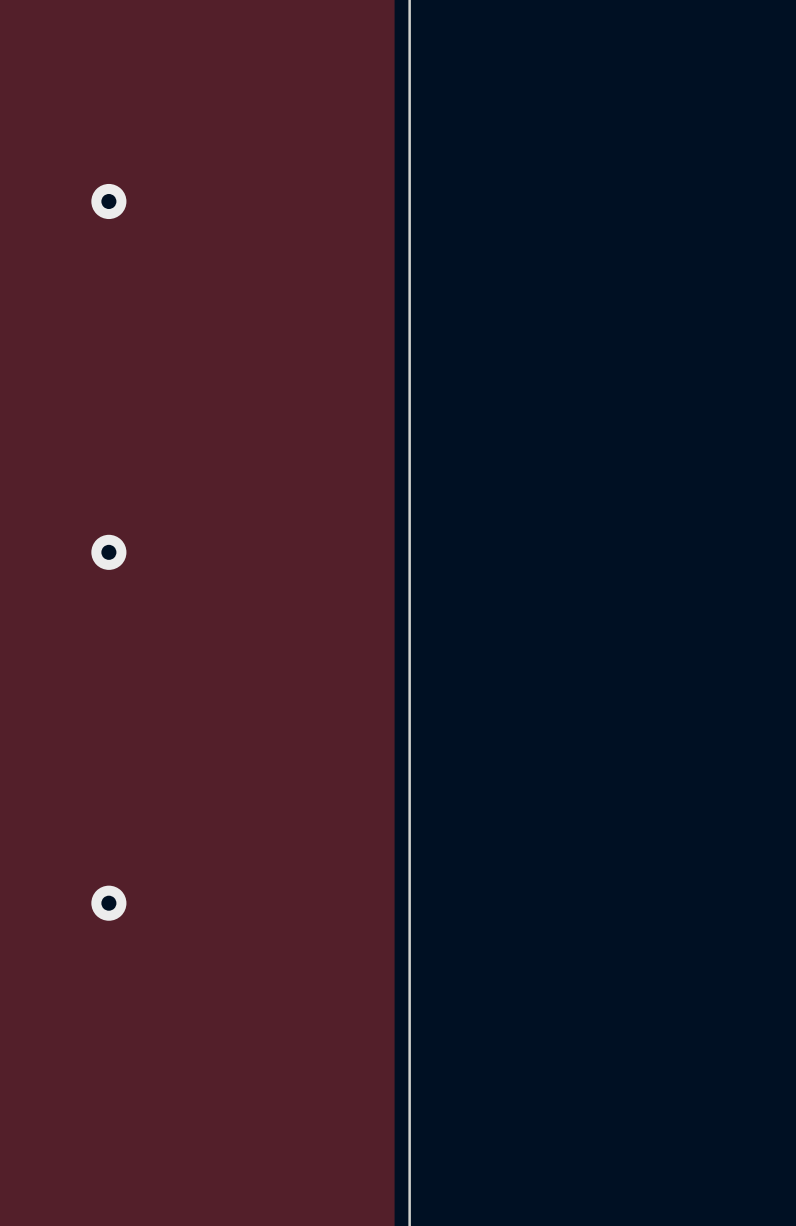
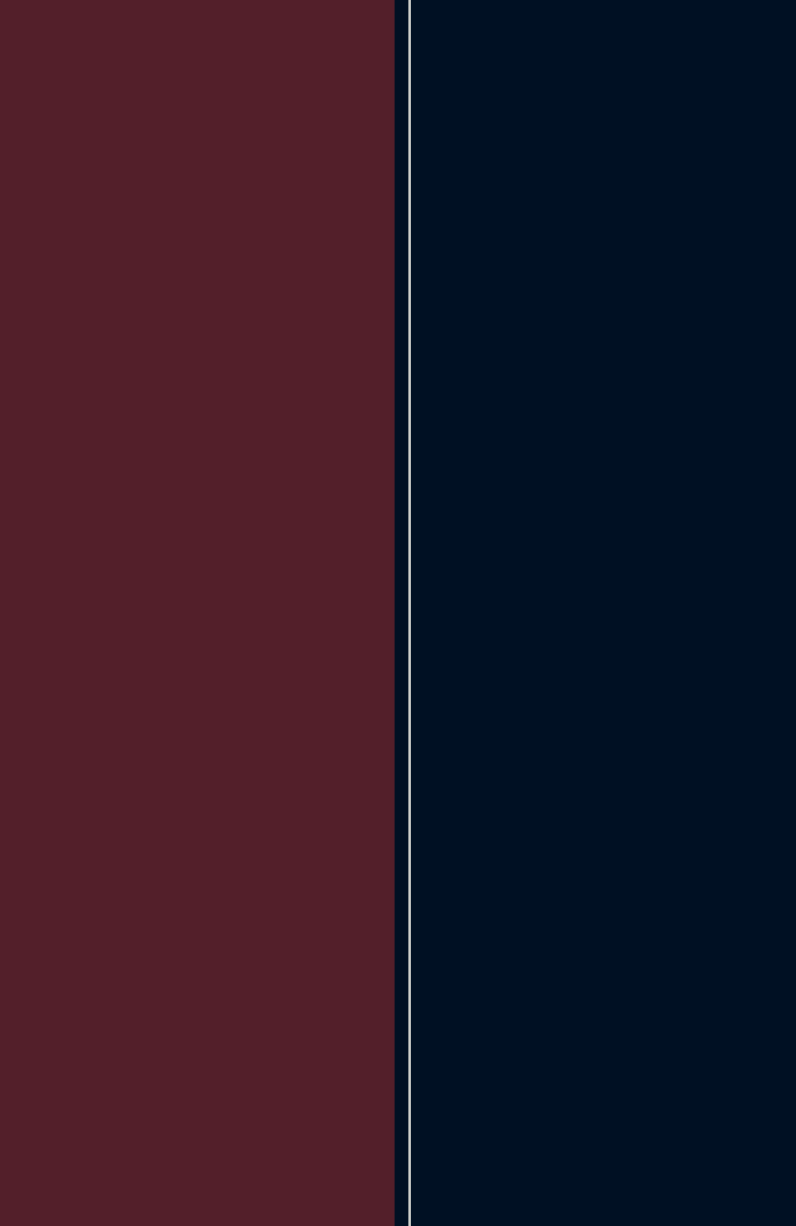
via: (108, 201) -> none
via: (108, 552) -> none
via: (108, 903) -> none

